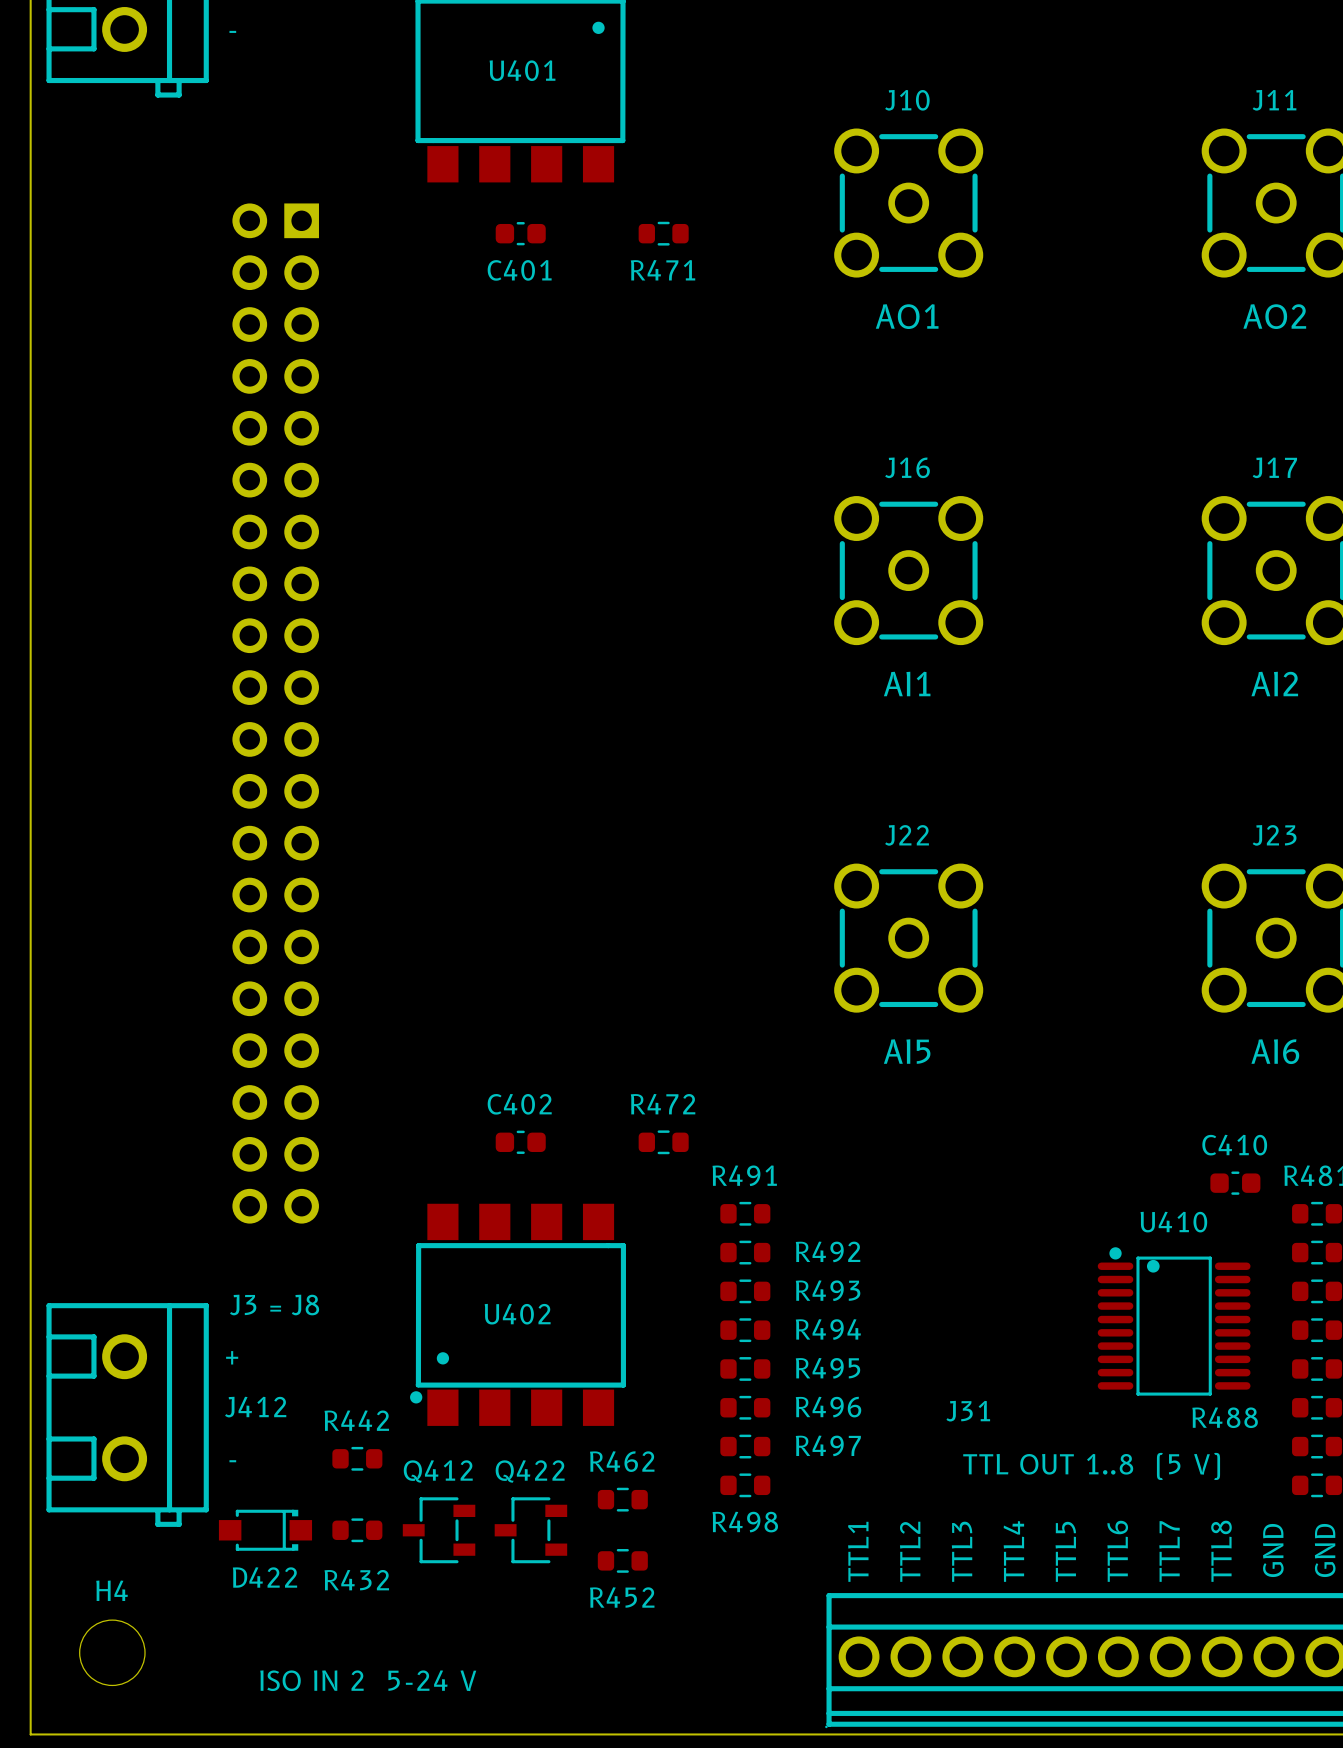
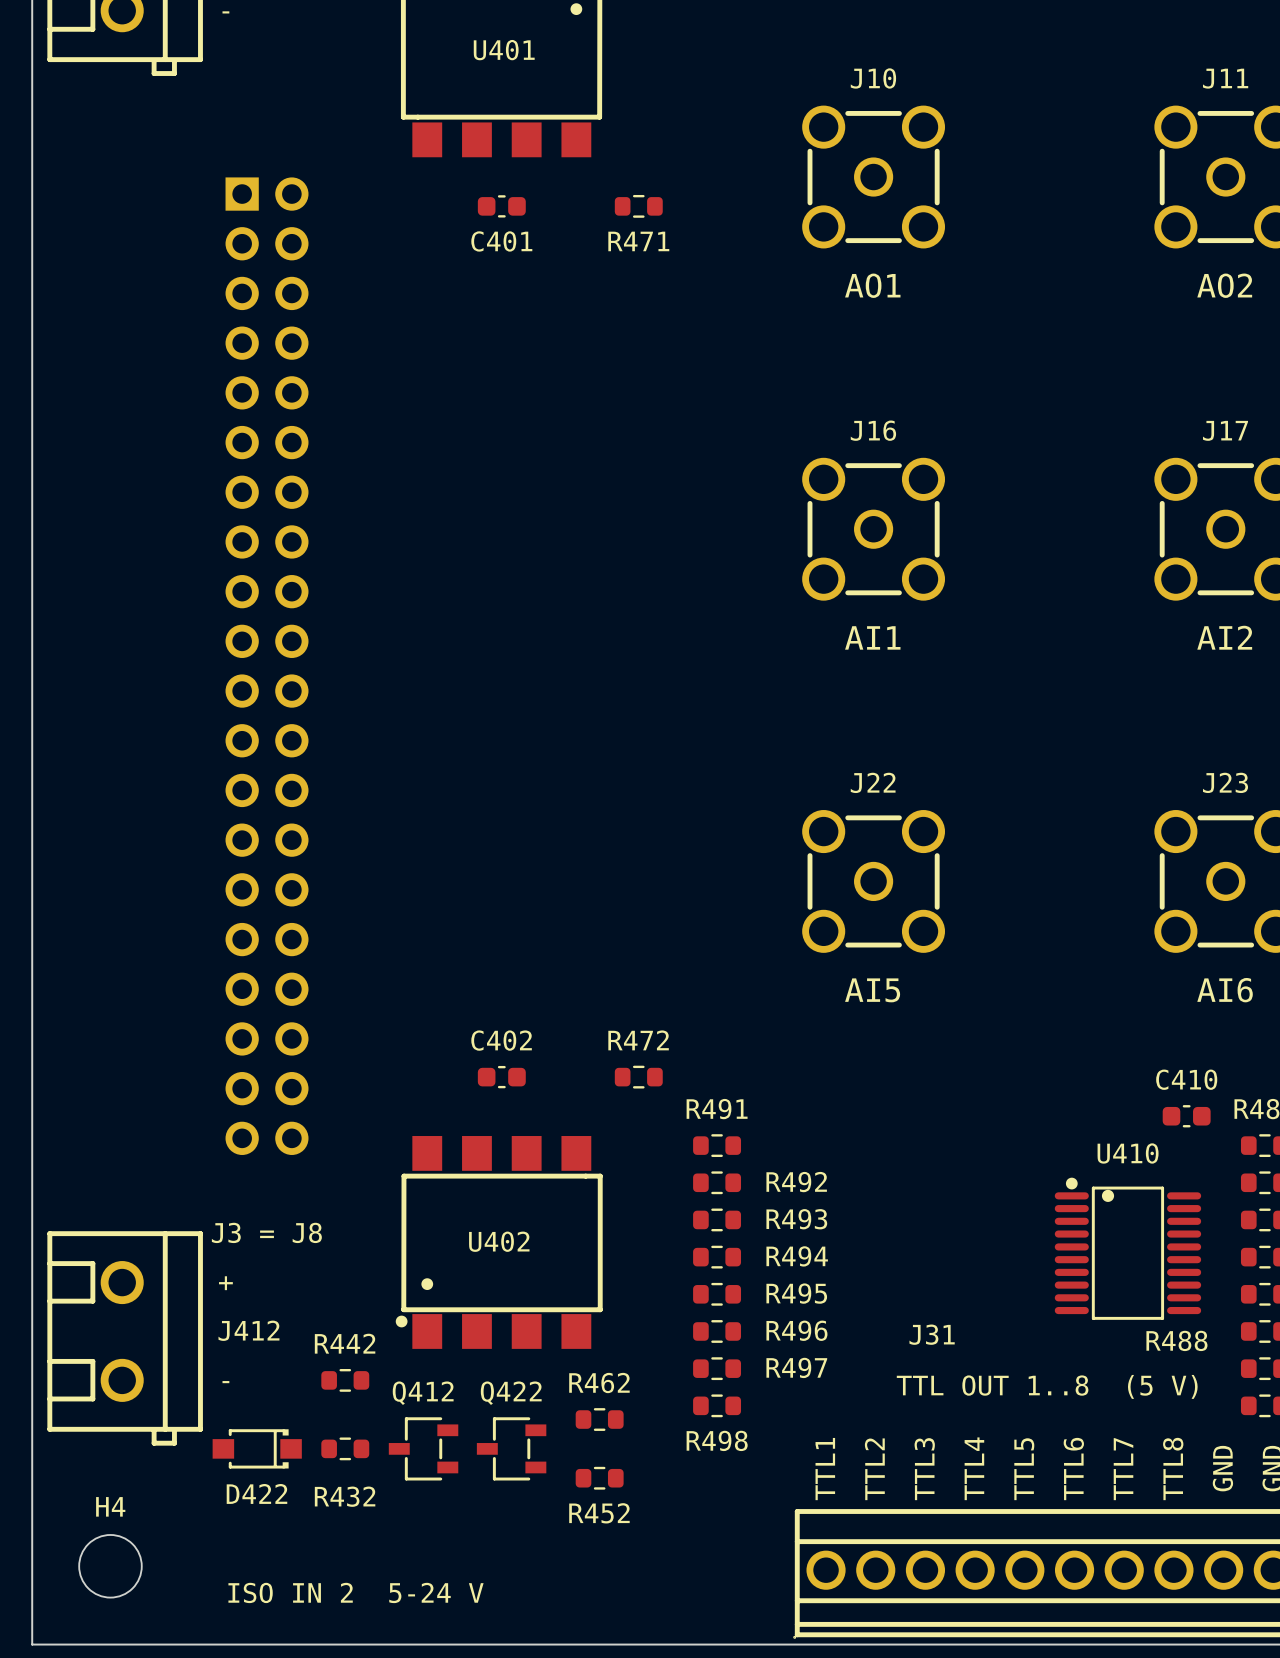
part footprint: [232, 203, 319, 1224] -> [225, 177, 309, 1155]

